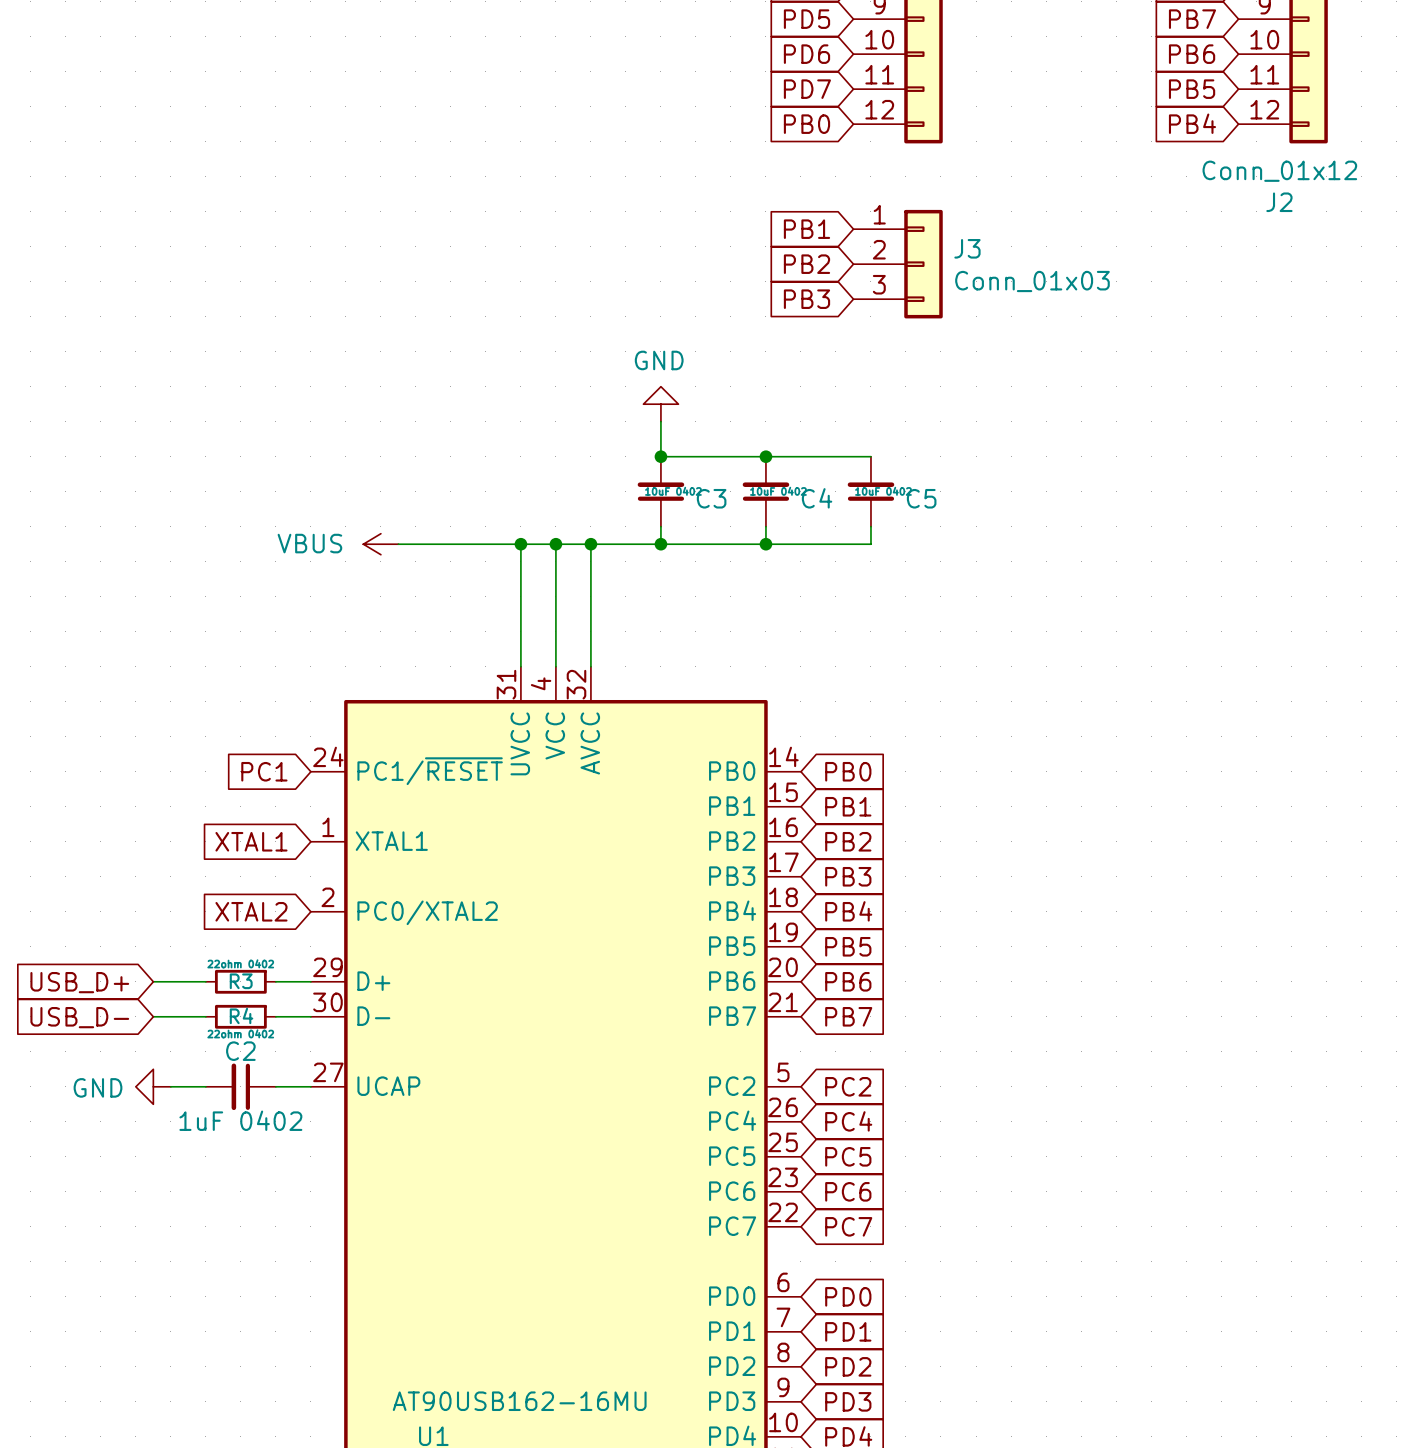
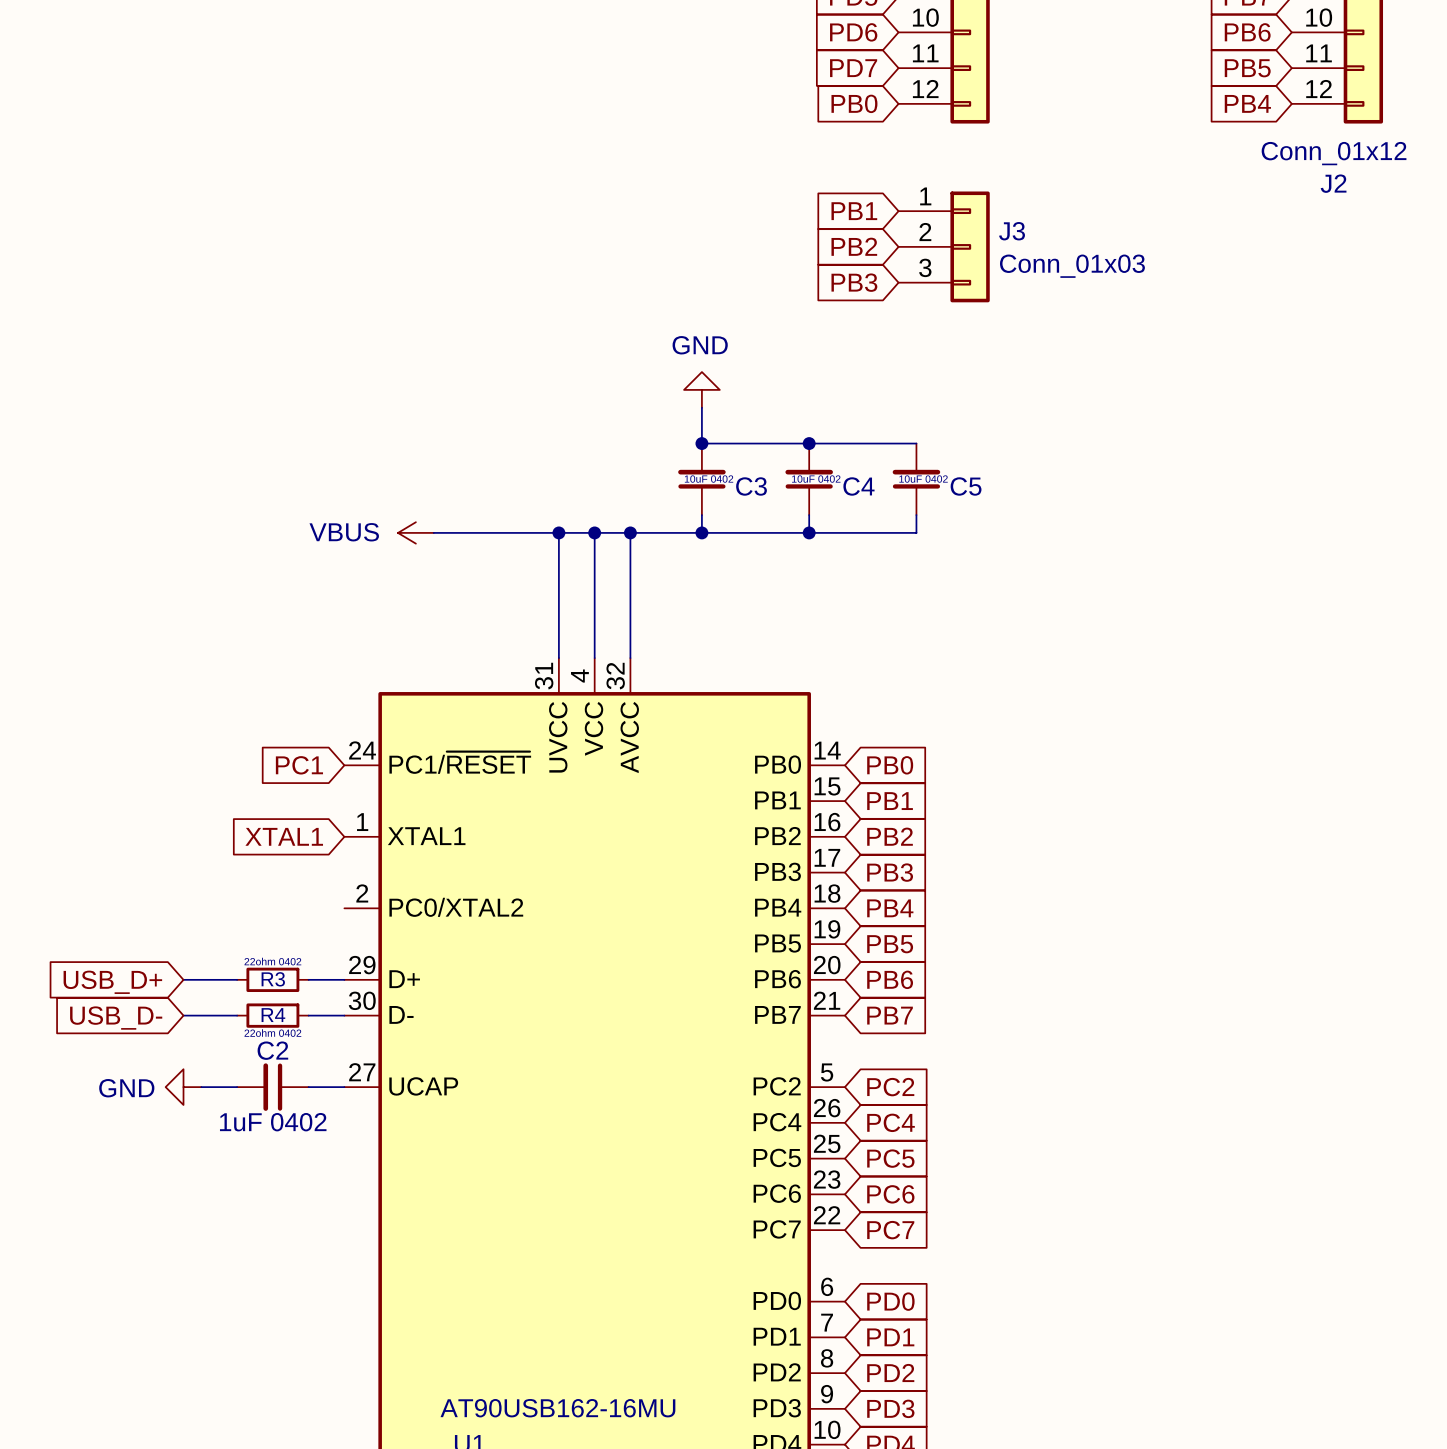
global label: XTAL2 (251, 911) -> none

